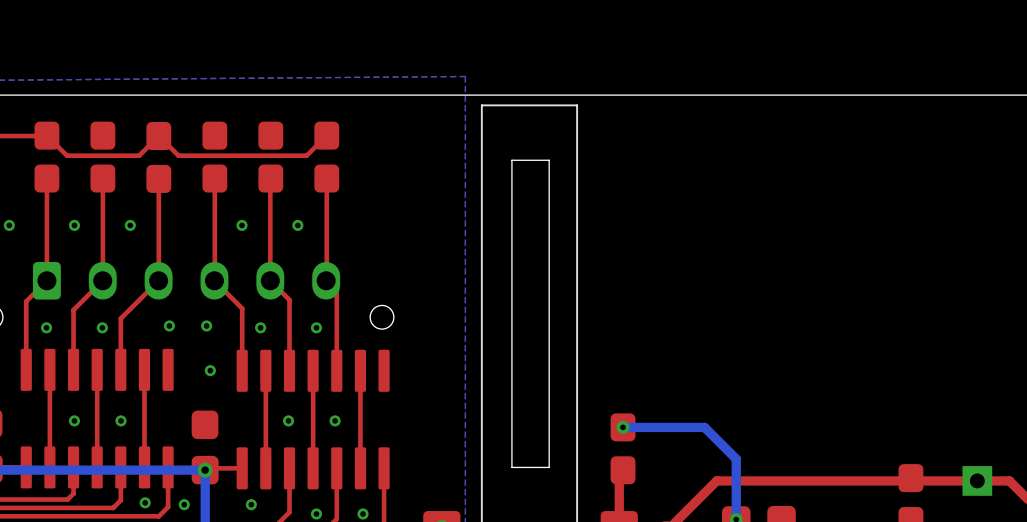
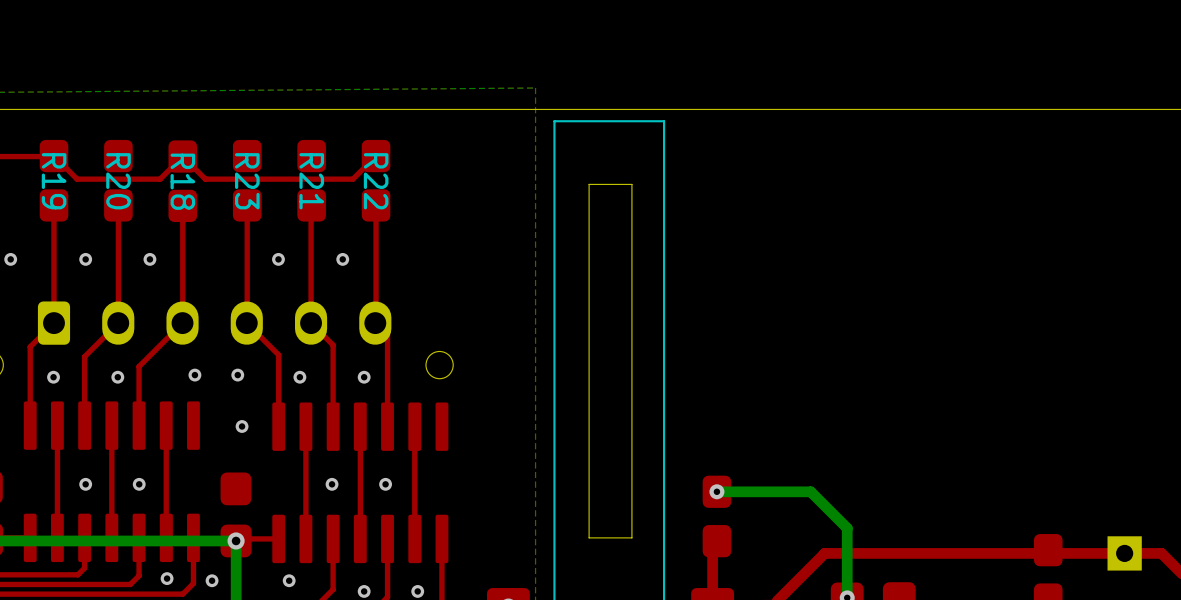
R19 name: none -> R19 (54, 181)
R20 name: none -> R20 (118, 181)
R18 name: none -> R18 (182, 181)
R23 name: none -> R23 (247, 181)
R21 name: none -> R21 (311, 181)
R22 name: none -> R22 (376, 181)

